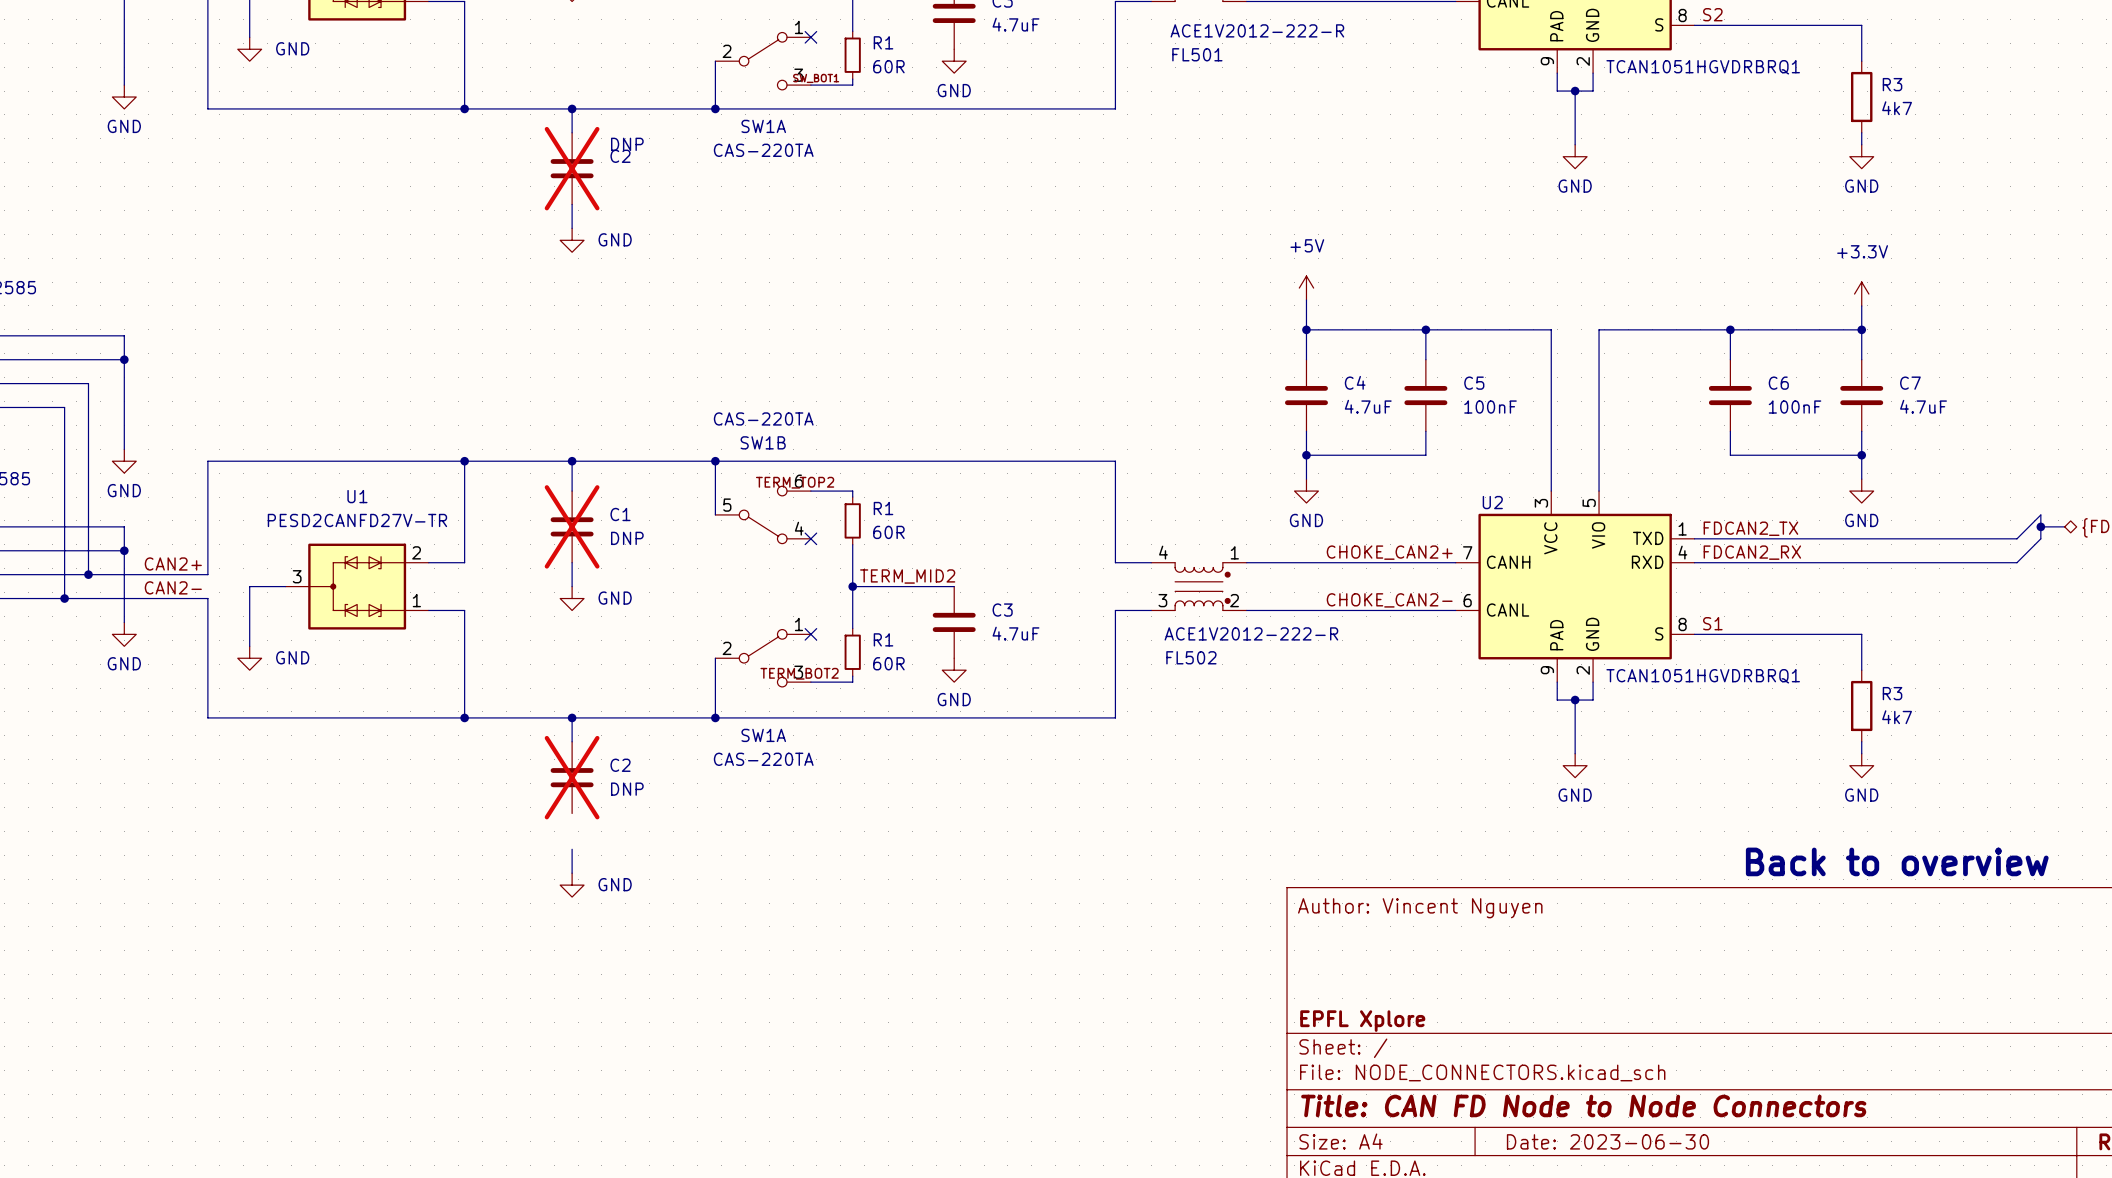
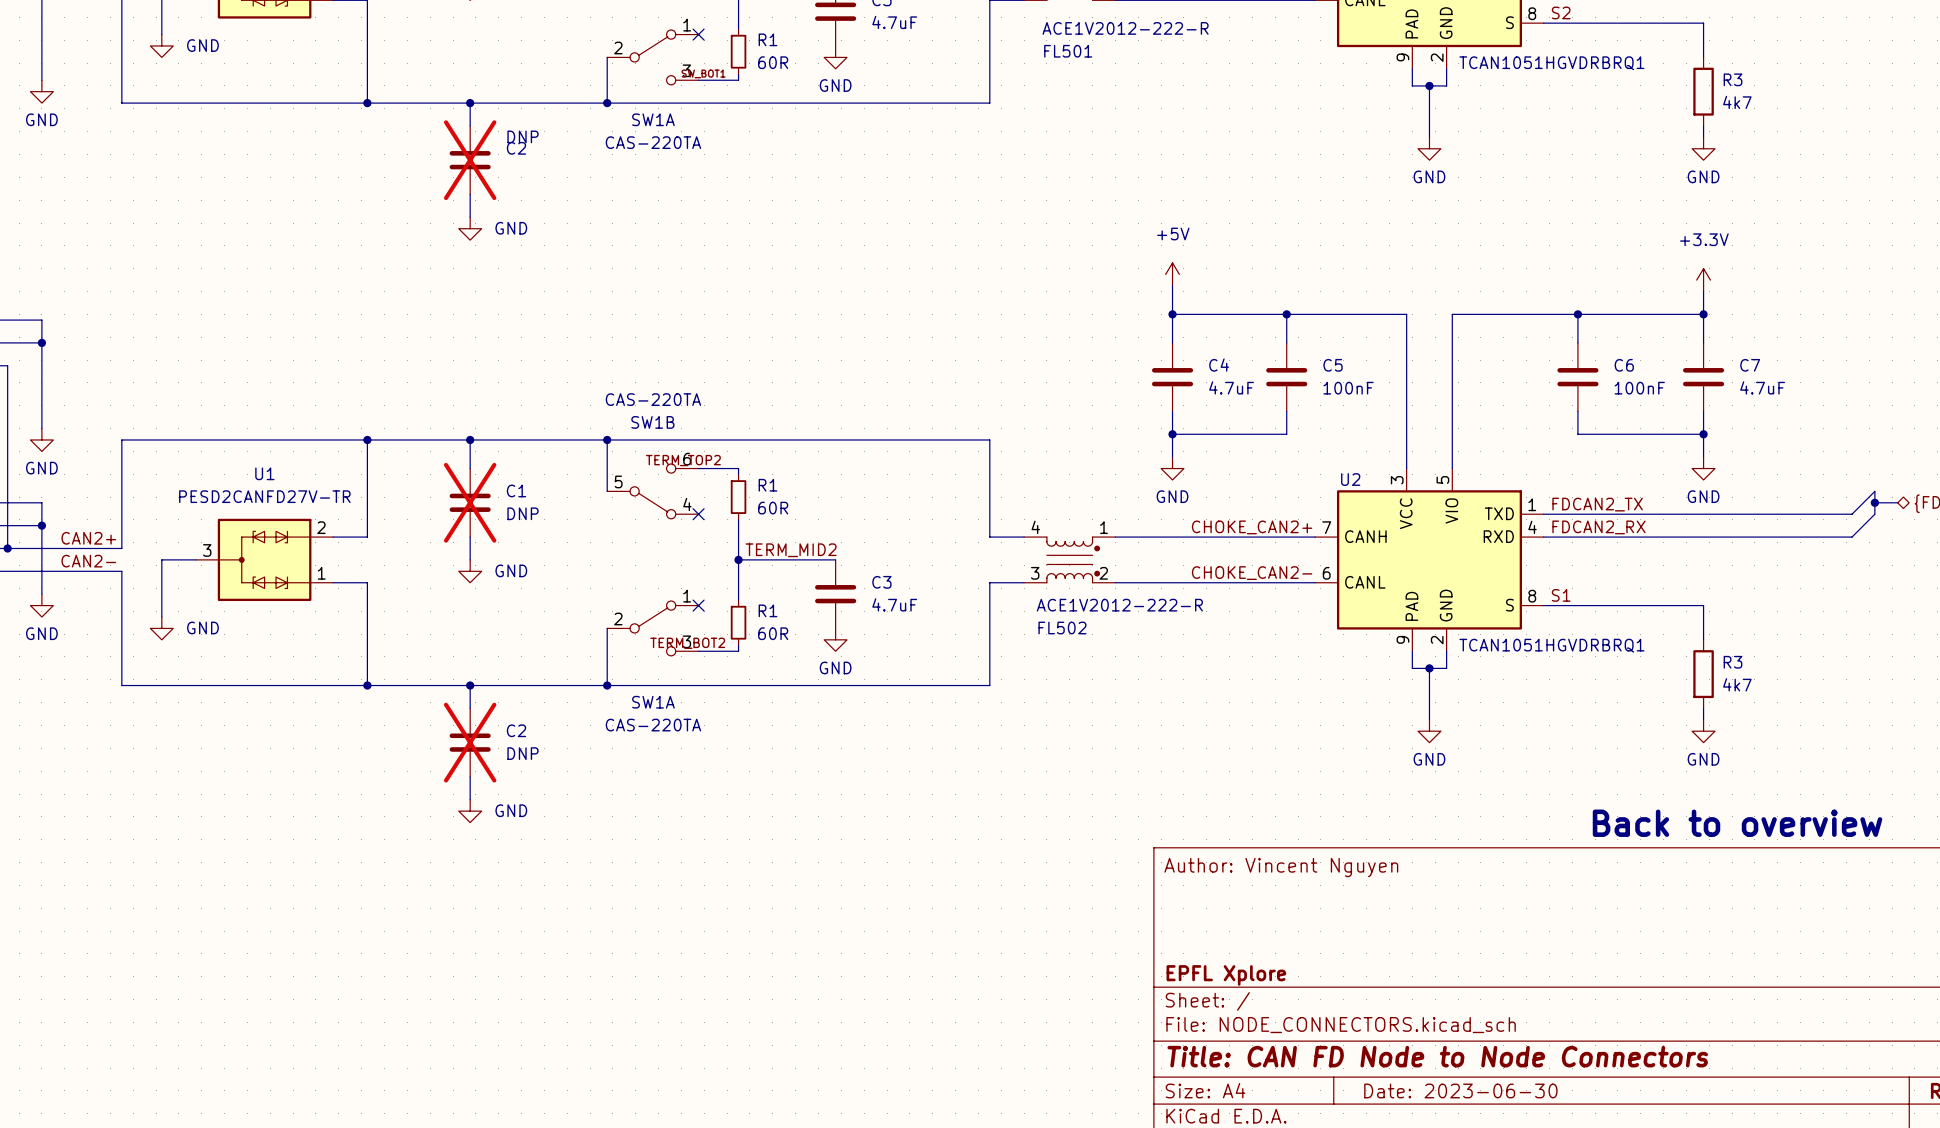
wire: (572, 849) (572, 873) -> (470, 776) (470, 799)
power symbol position: GND (572, 885) -> GND (470, 811)

